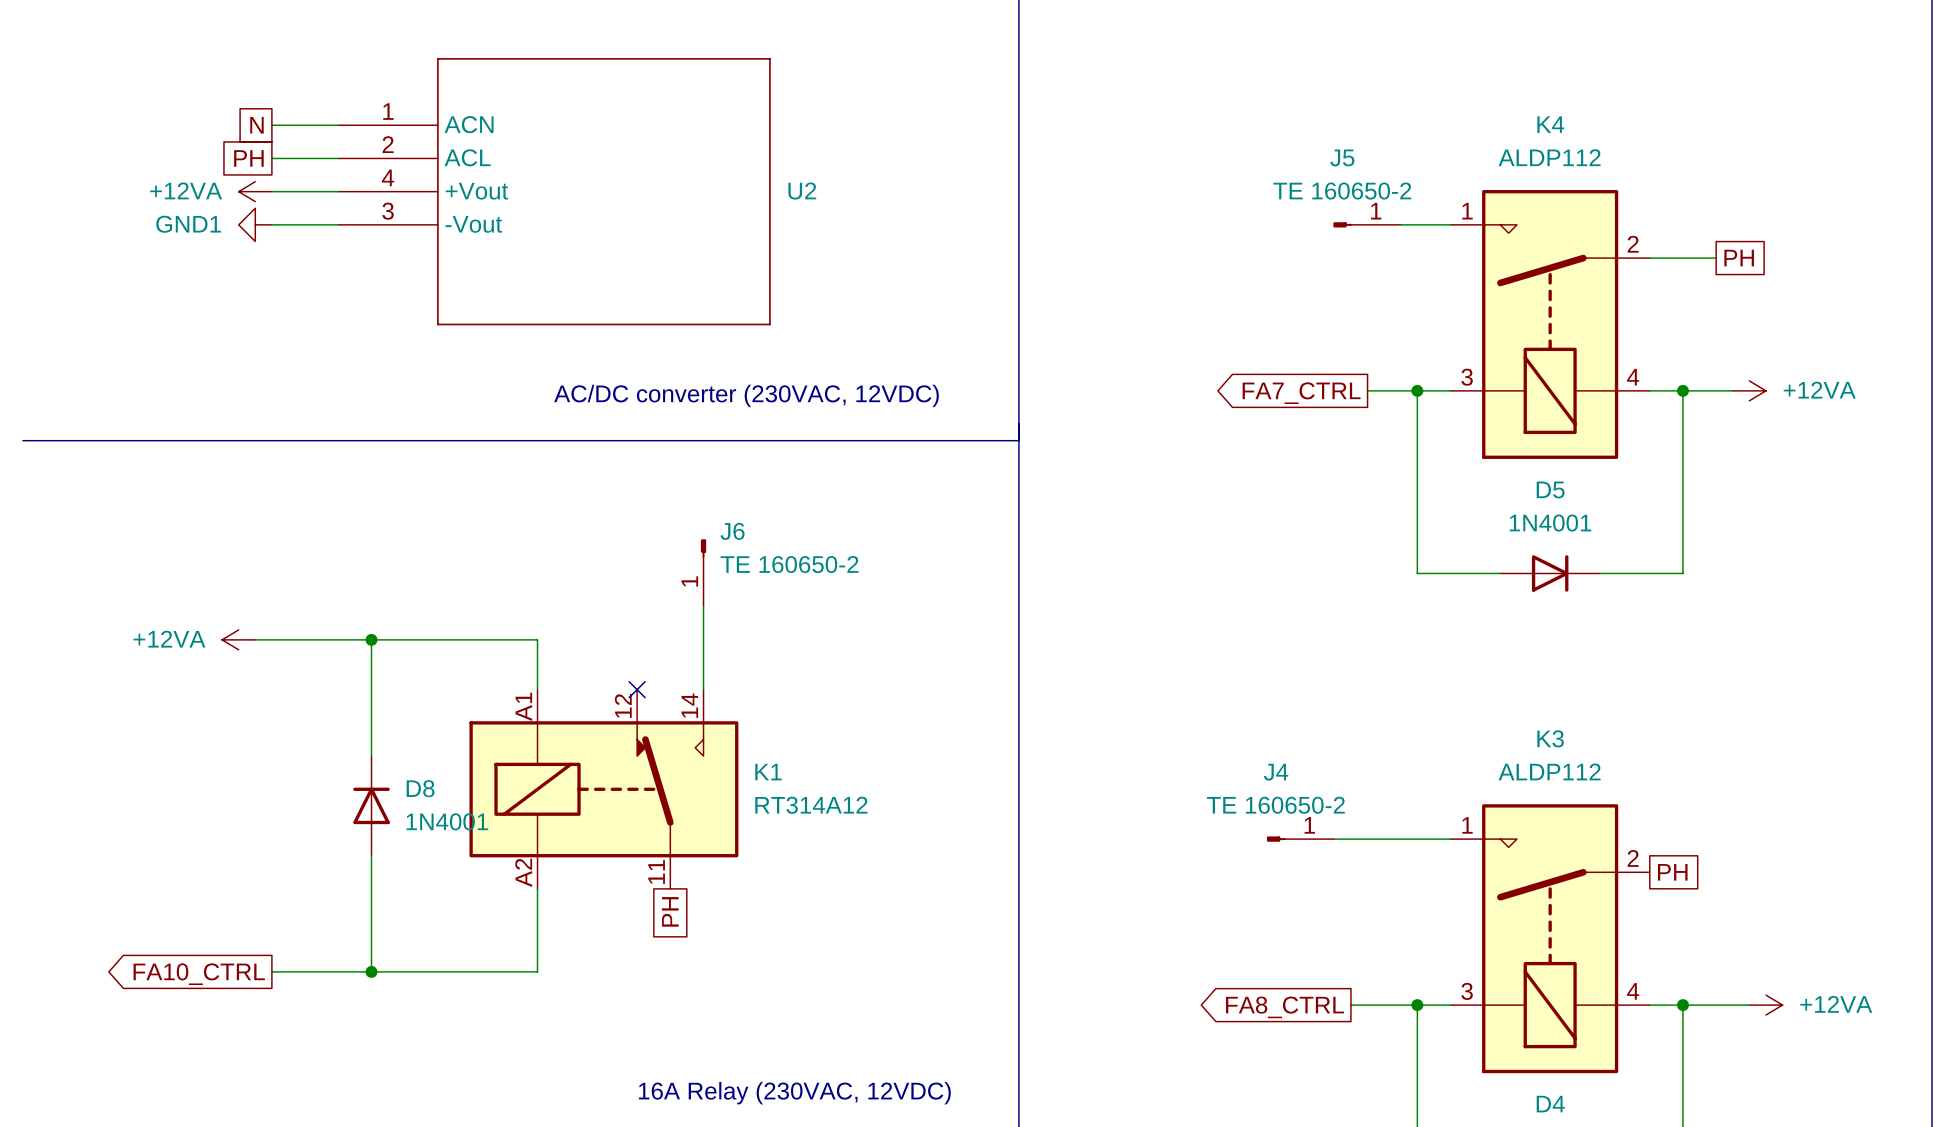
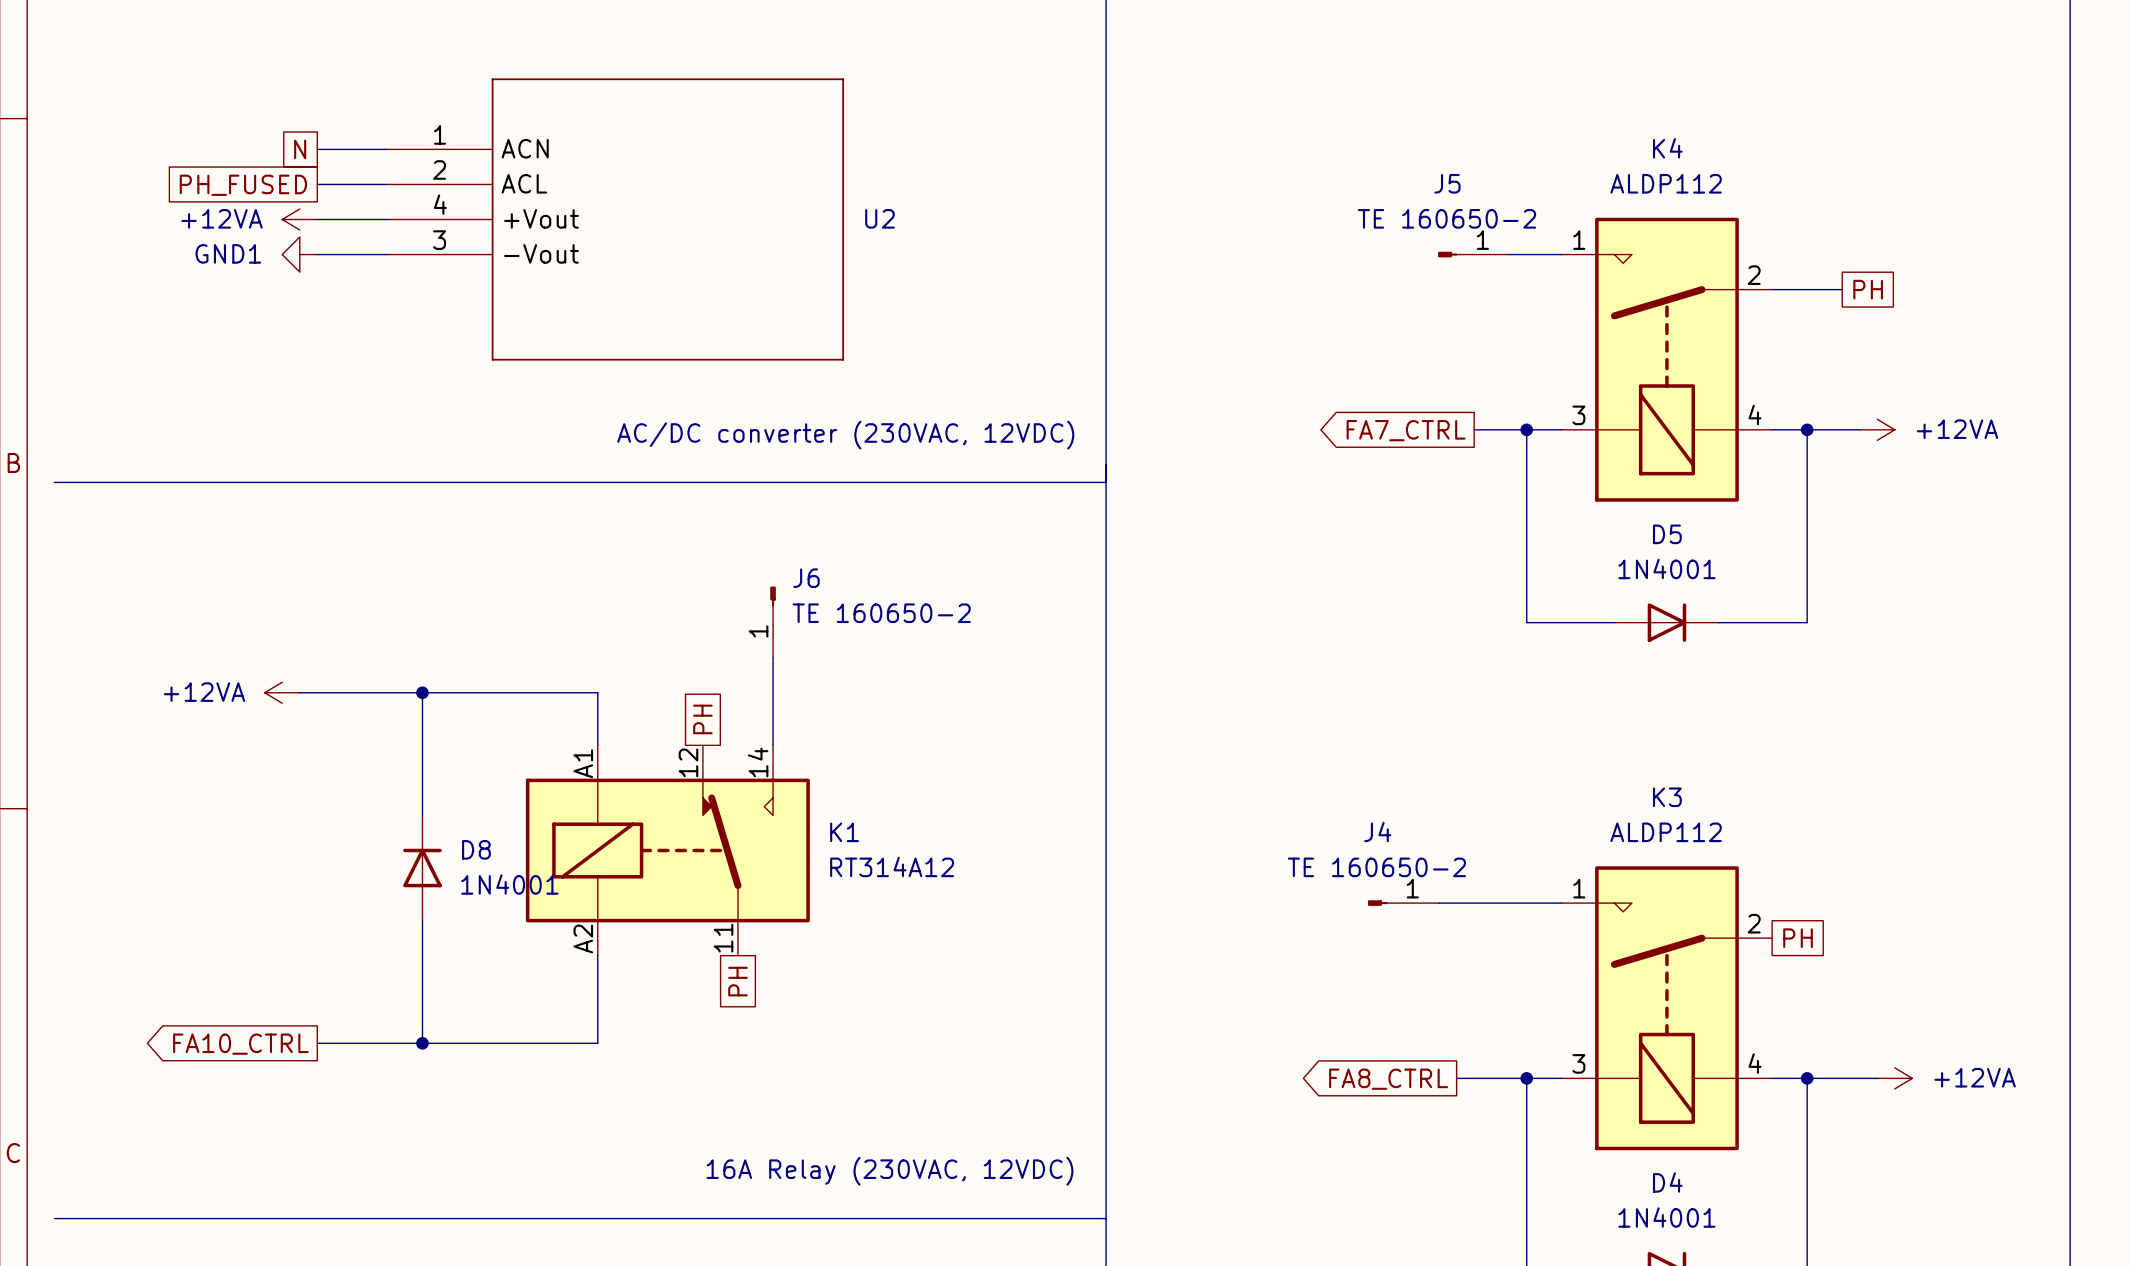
global label: PH (248, 158) -> PH_FUSED (243, 185)
global label: none -> PH (702, 719)
no-connect mark: (637, 689) -> none

